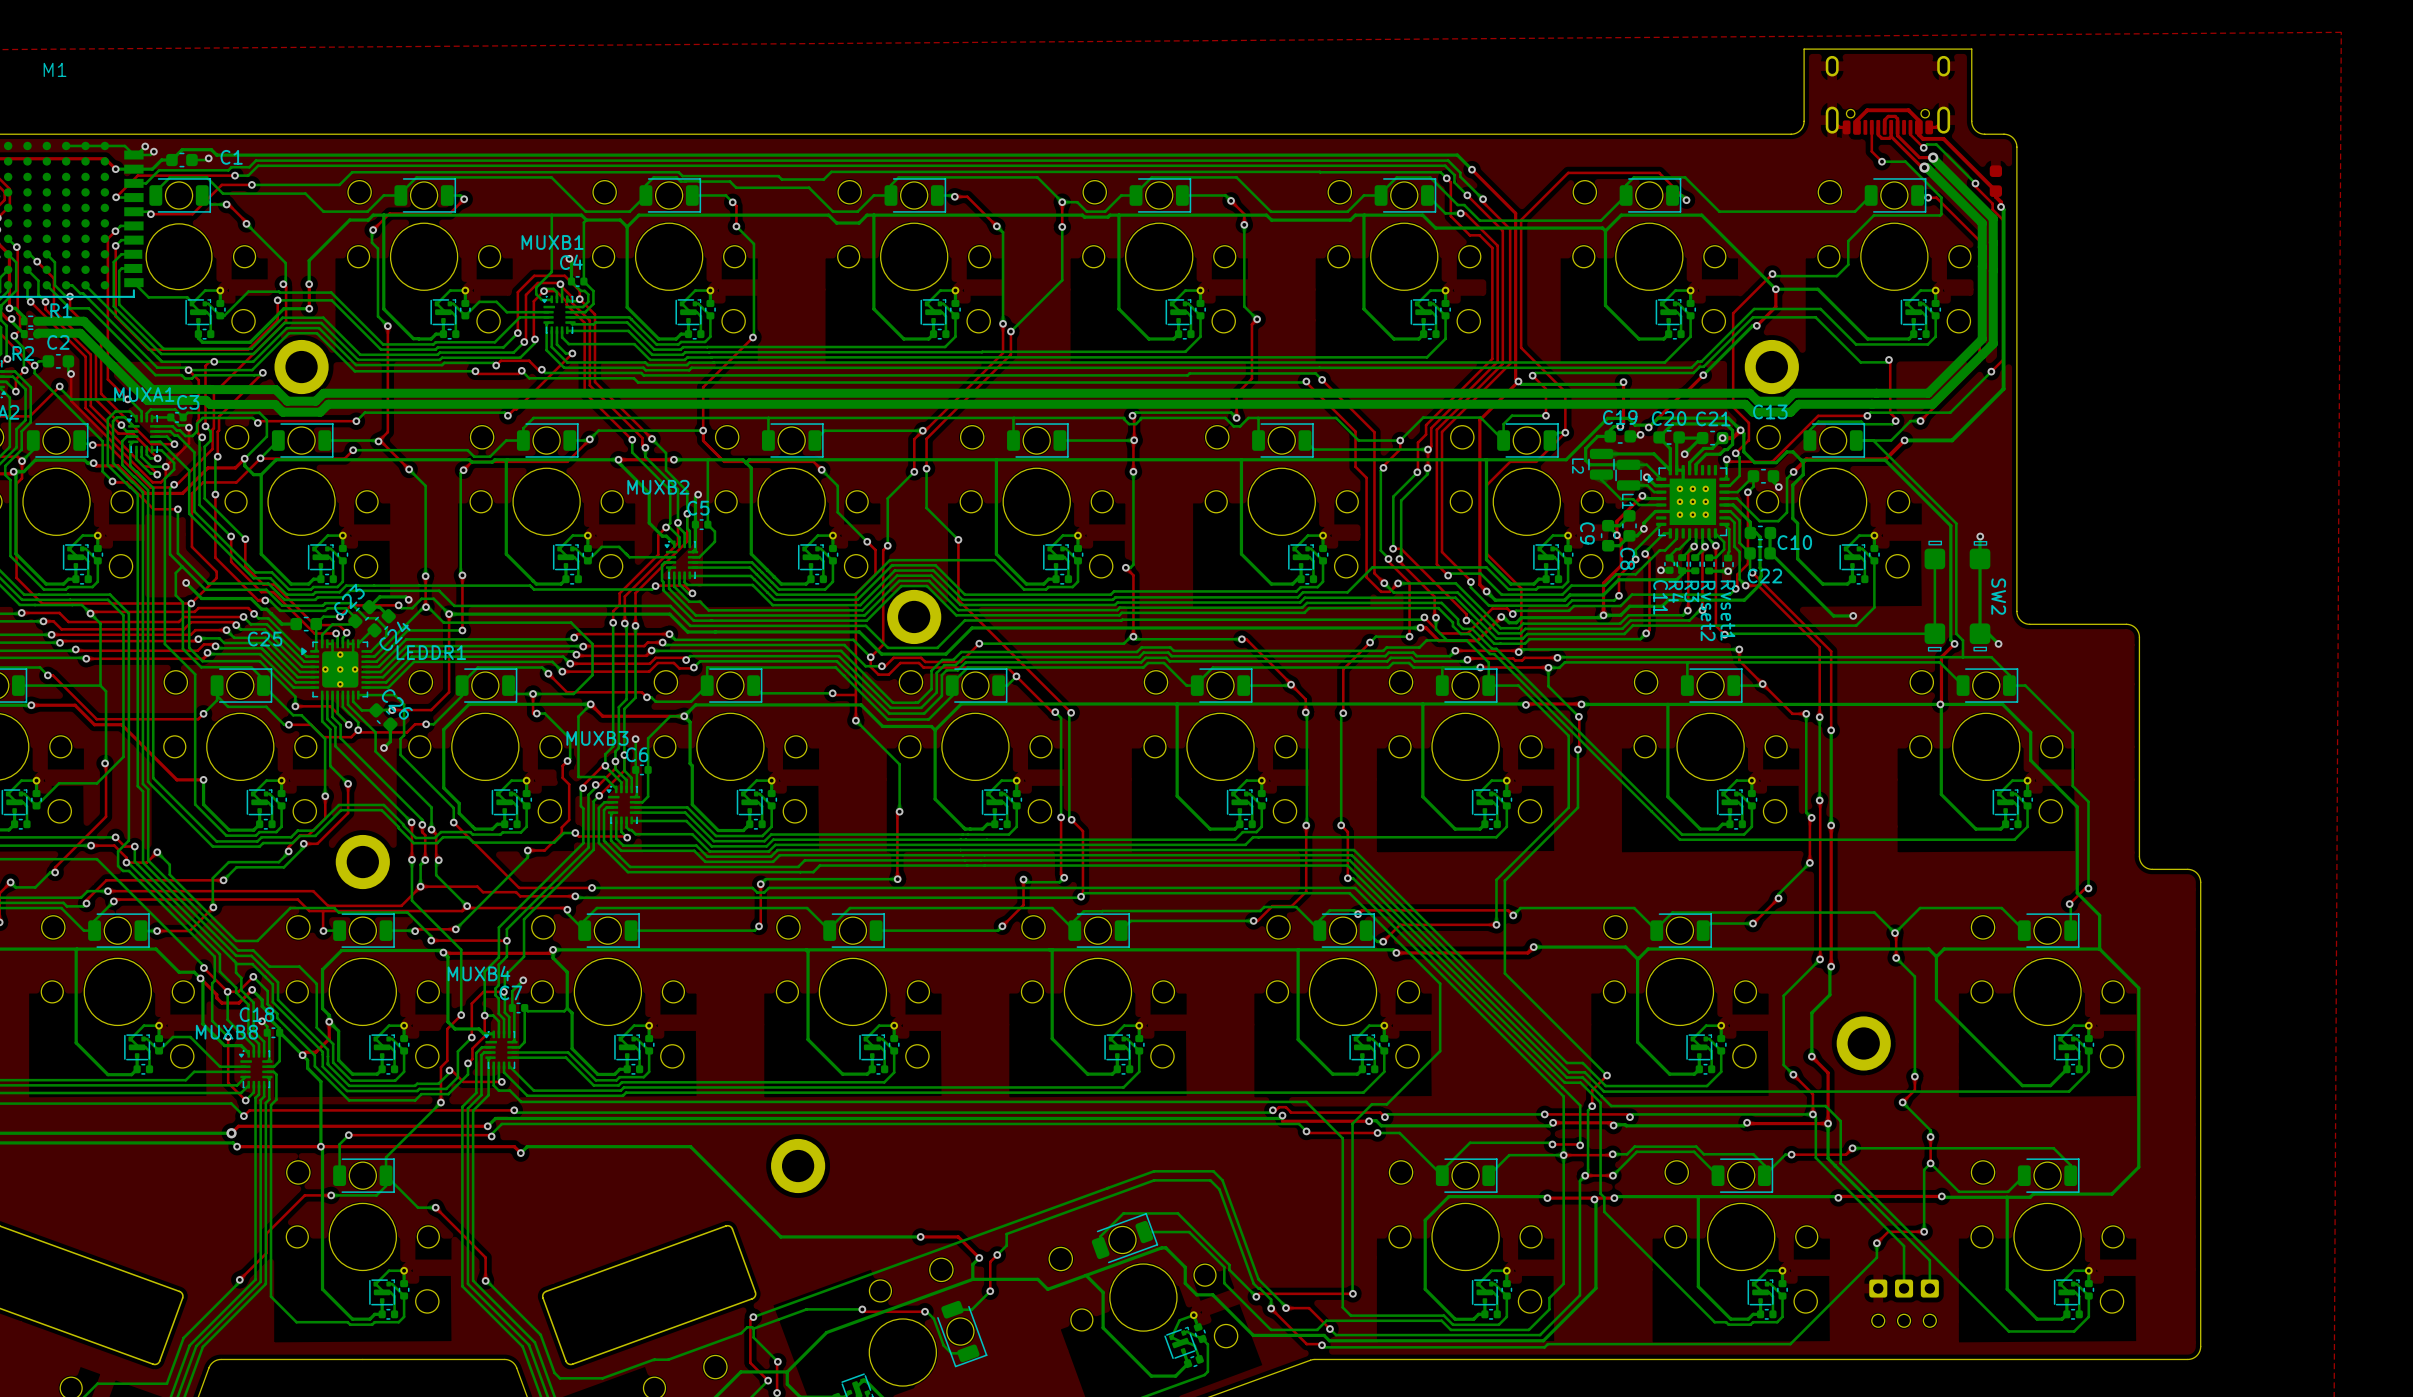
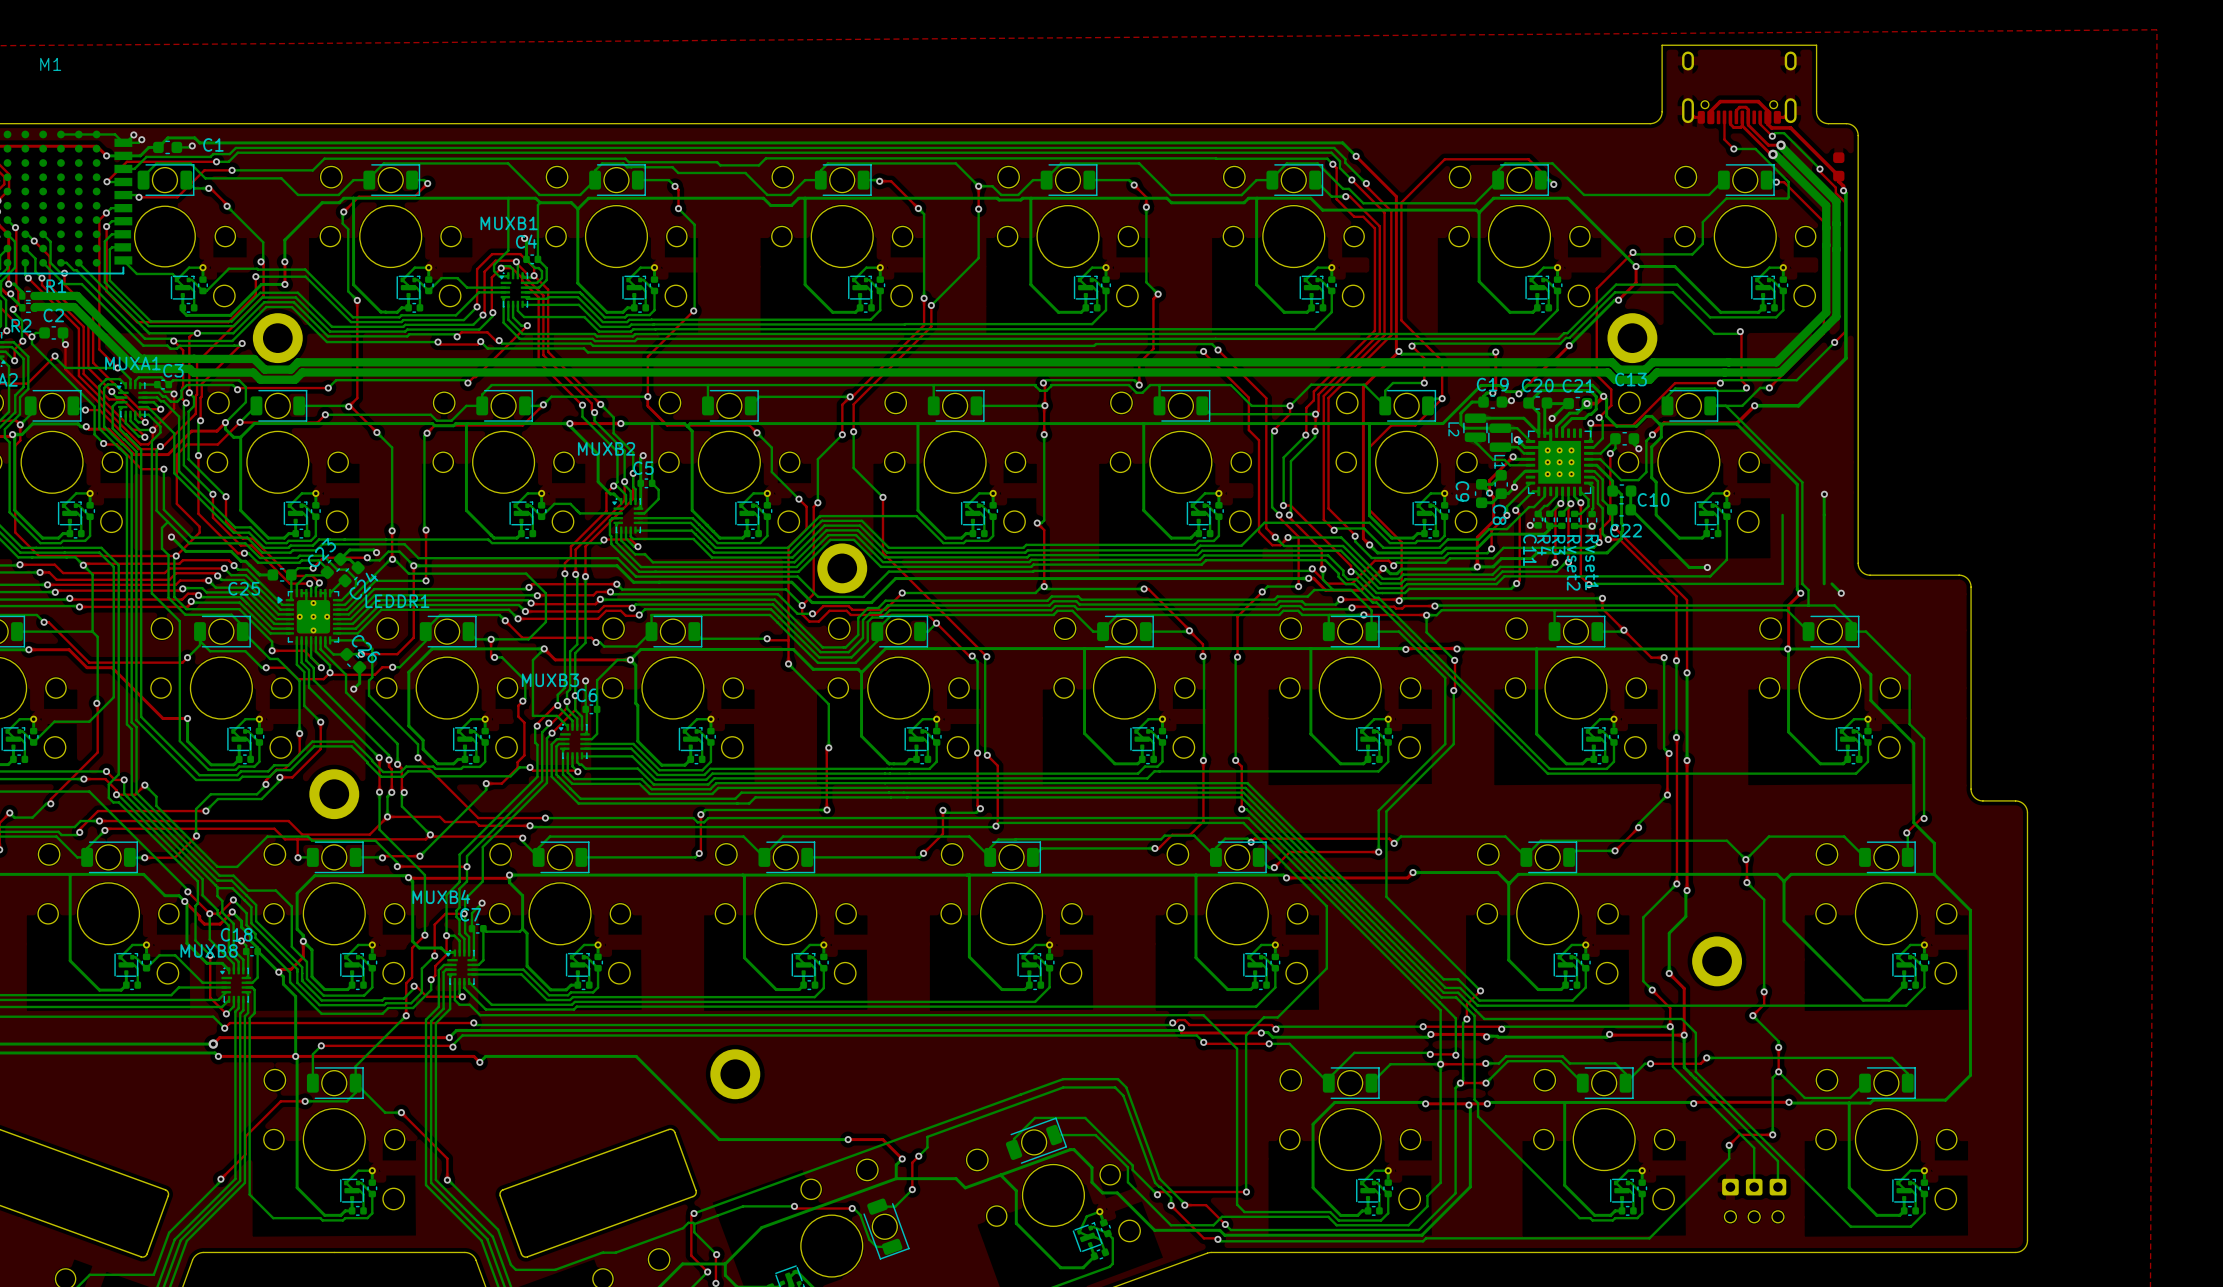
SW2: (1957, 596) -> none

